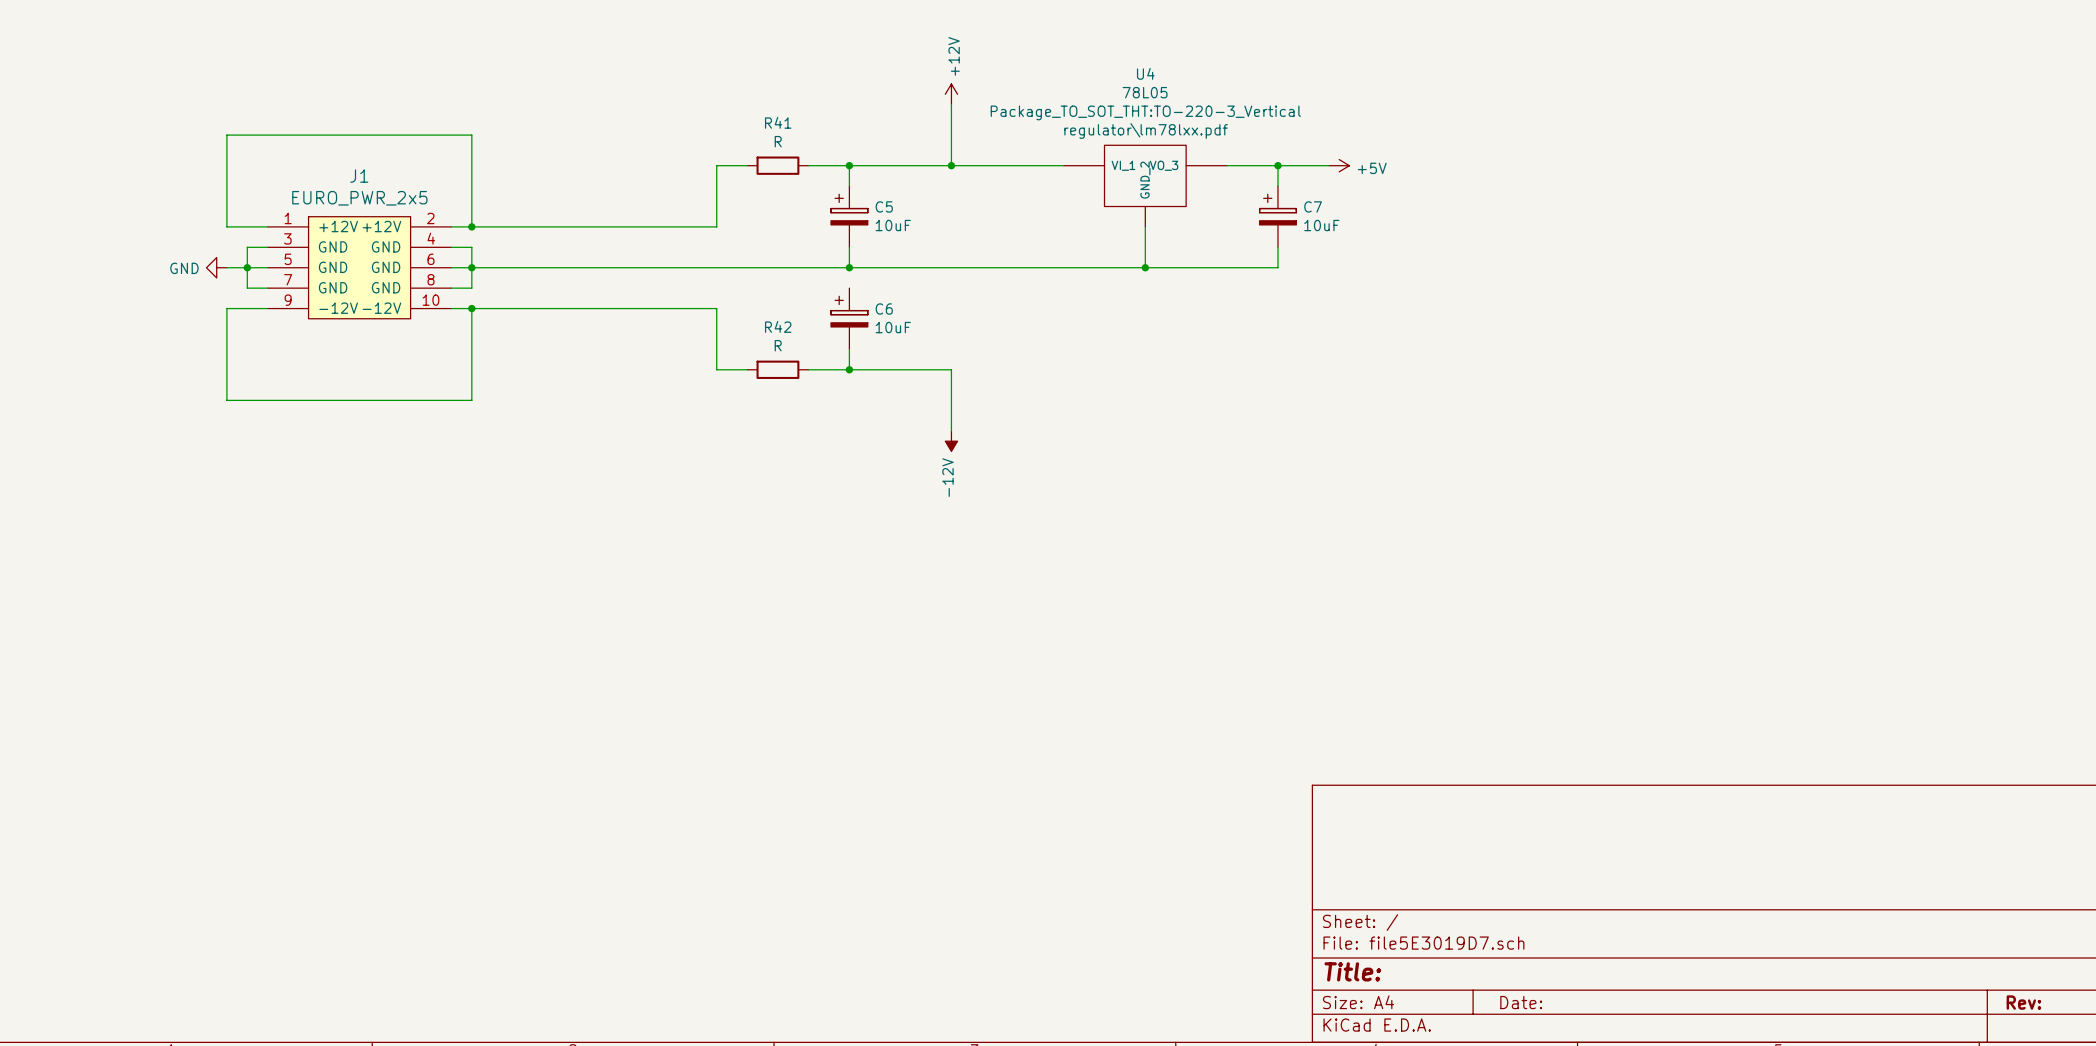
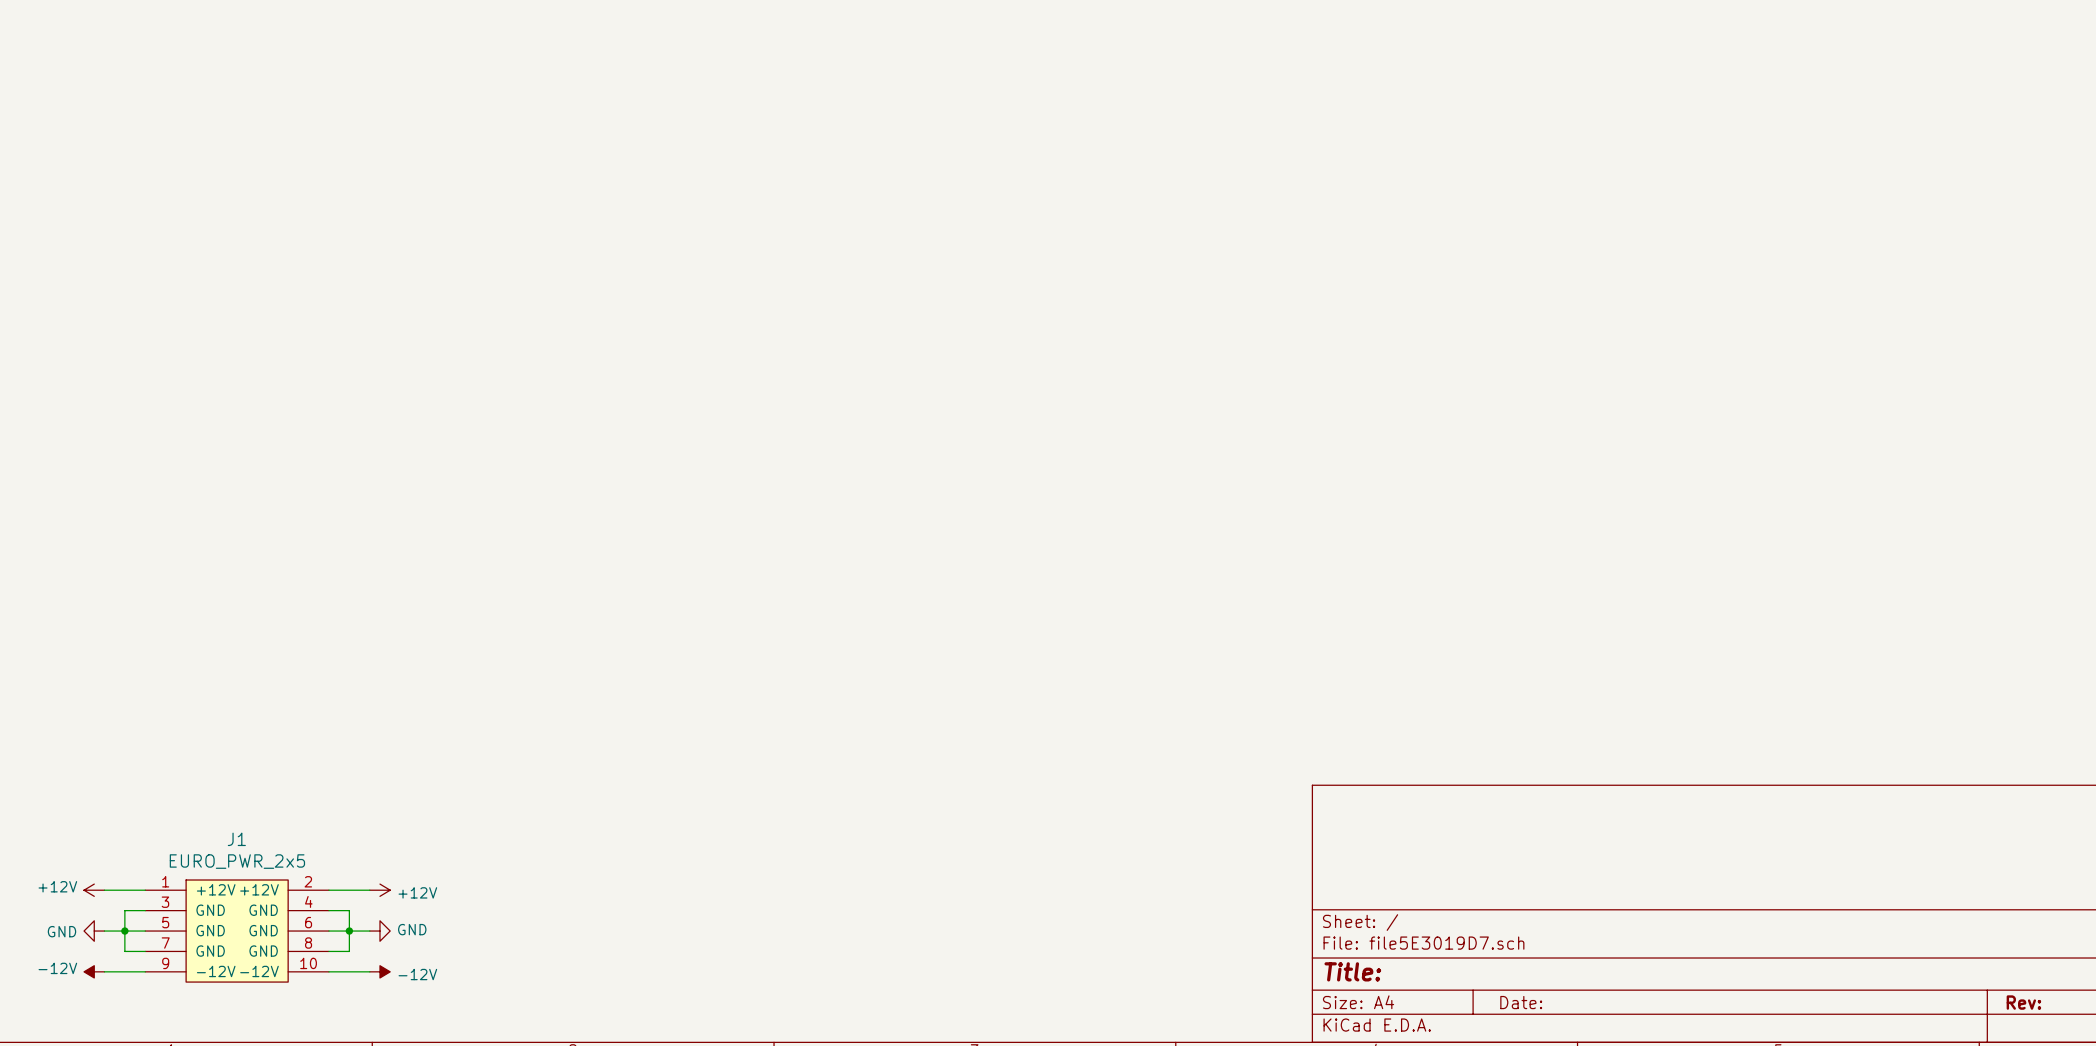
power symbol: +12V (951, 94) -> none
wire: (951, 104) (951, 165) -> none
wire: (747, 165) (716, 165) (716, 226) (451, 226) -> none
R41: R (777, 165) -> none
wire: (808, 165) (1063, 165) -> none
wire: (849, 165) (849, 186) -> none
junction: (849, 165) -> none
junction: (951, 165) -> none
wire: (1226, 165) (1329, 165) -> none
wire: (1277, 165) (1277, 186) -> none
junction: (1277, 165) -> none
power symbol: +5V (1339, 165) -> none
U4: 78L05 (1145, 186) -> none
C5: 10uF (849, 216) -> none
C7: 10uF (1277, 216) -> none
wire: (267, 226) (226, 226) (226, 135) (471, 135) (471, 226) -> none
junction: (471, 226) -> none
wire: (1145, 226) (1145, 267) -> none
wire: (267, 247) (247, 247) (247, 288) (267, 288) -> none
wire: (451, 247) (471, 247) (471, 288) (451, 288) -> none
wire: (849, 247) (849, 267) -> none
wire: (1277, 247) (1277, 267) (451, 267) -> none
power symbol: GND (216, 267) -> none
wire: (226, 267) (267, 267) -> none
junction: (247, 267) -> none
J1 position: (359, 267) -> (237, 931)
junction: (471, 267) -> none
junction: (849, 267) -> none
junction: (1145, 267) -> none
wire: (267, 308) (226, 308) (226, 400) (471, 400) (471, 308) -> none
wire: (451, 308) (716, 308) (716, 369) (747, 369) -> none
junction: (471, 308) -> none
C6: 10uF (849, 318) -> none
wire: (849, 349) (849, 369) -> none
R42: R (777, 369) -> none
wire: (808, 369) (951, 369) (951, 431) -> none
junction: (849, 369) -> none
power symbol: -12V (951, 441) -> none
power symbol: none -> +12V (94, 890)
wire: none -> (104, 890) (145, 890)
wire: none -> (328, 890) (369, 890)
power symbol: none -> +12V (379, 890)
wire: none -> (145, 910) (124, 910) (124, 951) (145, 951)
wire: none -> (328, 910) (349, 910) (349, 951) (328, 951)
power symbol: none -> GND (94, 931)
wire: none -> (104, 931) (145, 931)
junction: none -> (124, 931)
wire: none -> (328, 931) (369, 931)
junction: none -> (349, 931)
power symbol: none -> GND (379, 931)
power symbol: none -> -12V (94, 971)
wire: none -> (104, 971) (145, 971)
wire: none -> (328, 971) (369, 971)
power symbol: none -> -12V (379, 971)

